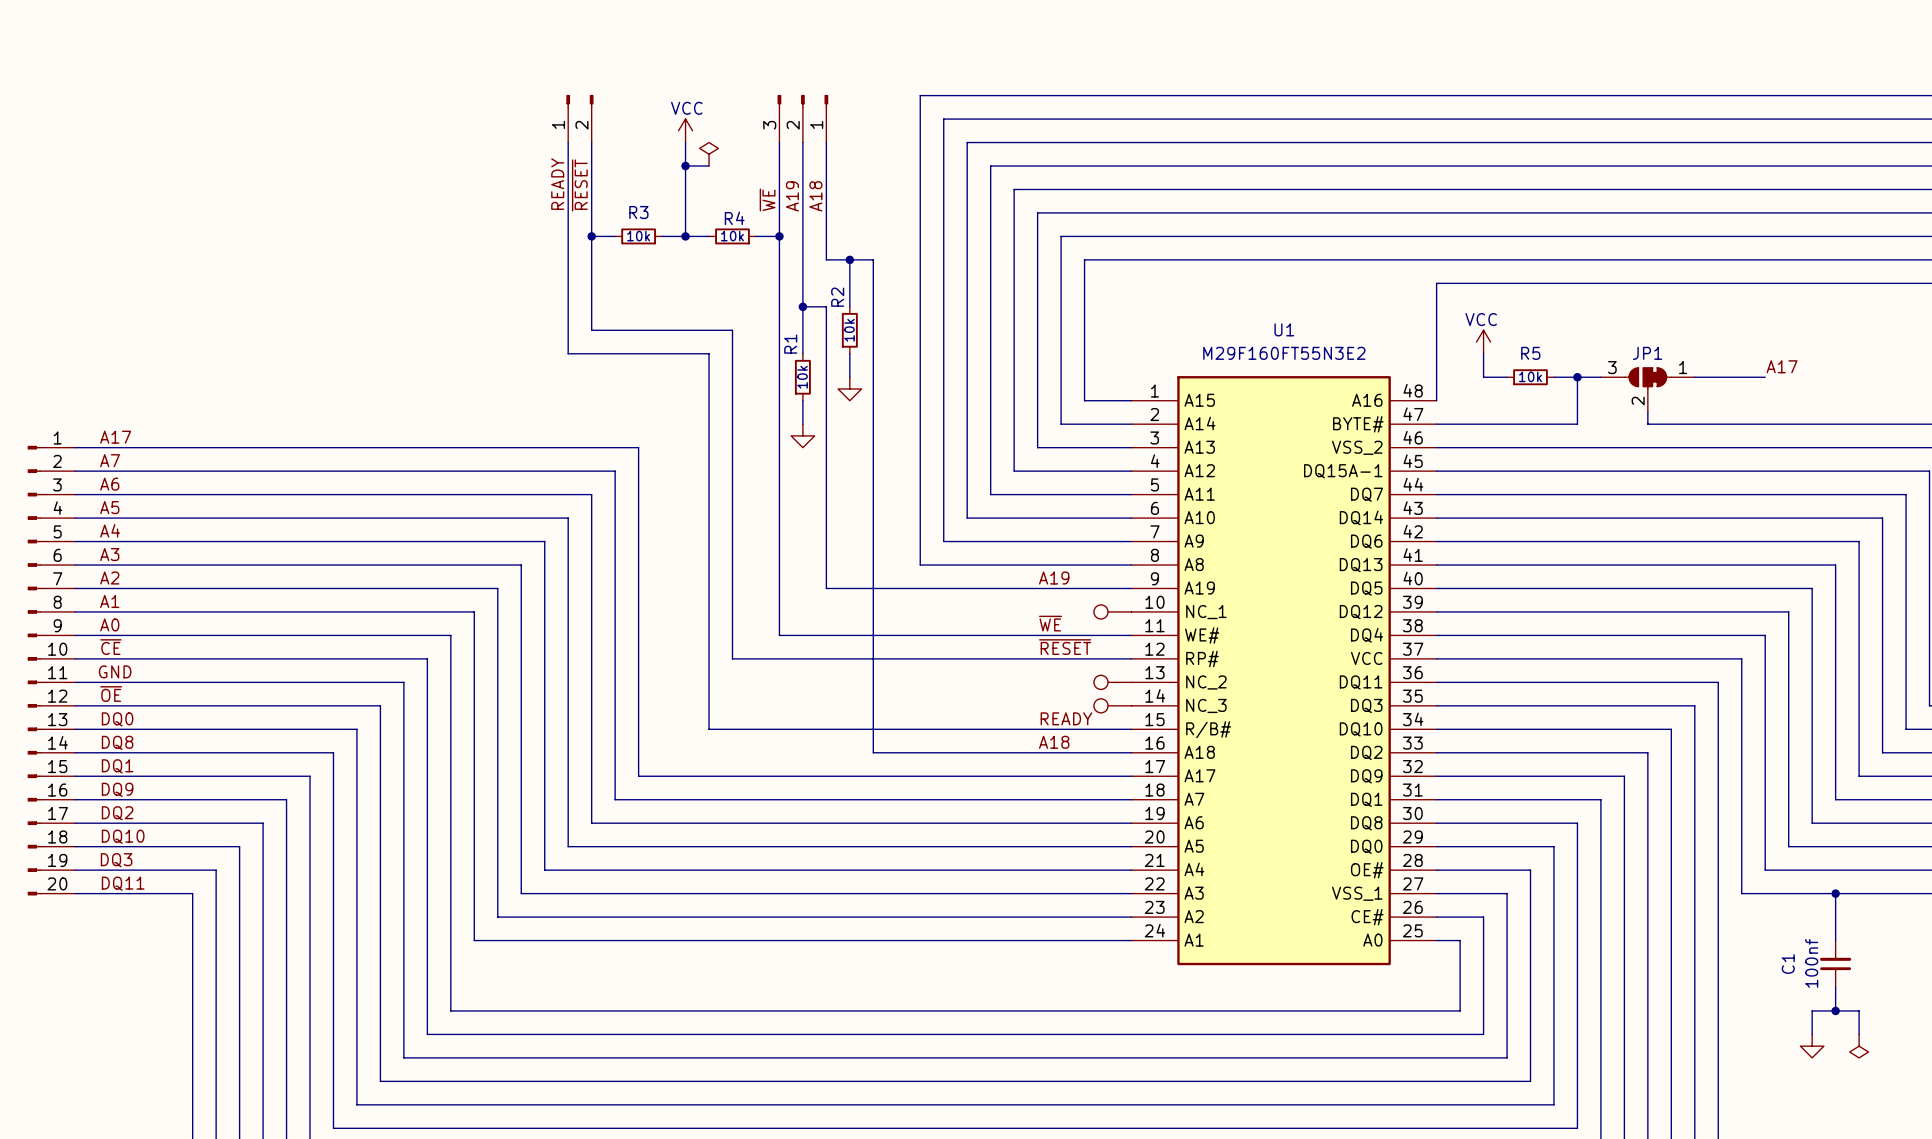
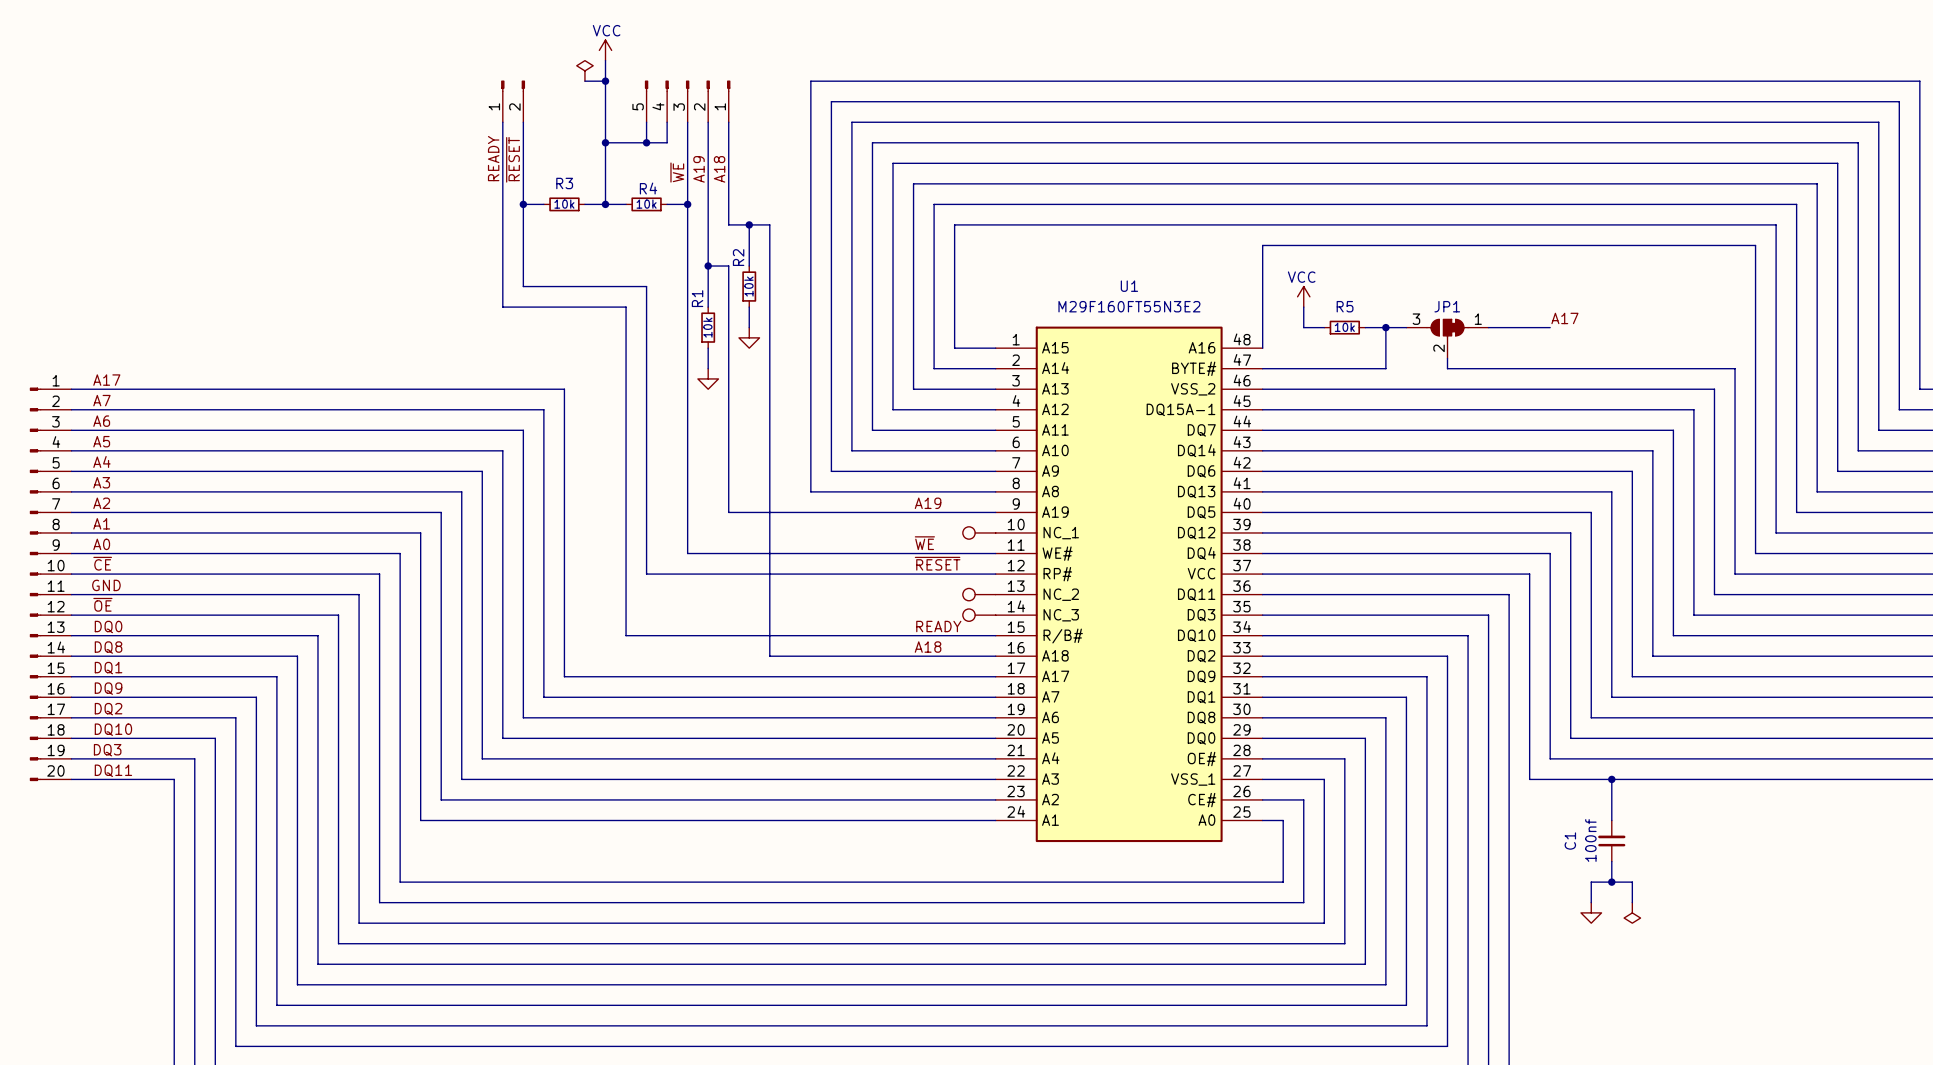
wire: none -> (605, 60) (605, 122)
wire: none -> (584, 81) (605, 81)
junction: none -> (605, 81)
part: none -> (687, 101)
power symbol position: VCC (685, 130) -> VCC (605, 50)
wire: none -> (646, 122) (646, 142)
wire: none -> (667, 122) (667, 142) (626, 142)
power symbol position: (709, 154) -> (584, 70)
junction: none -> (646, 142)

